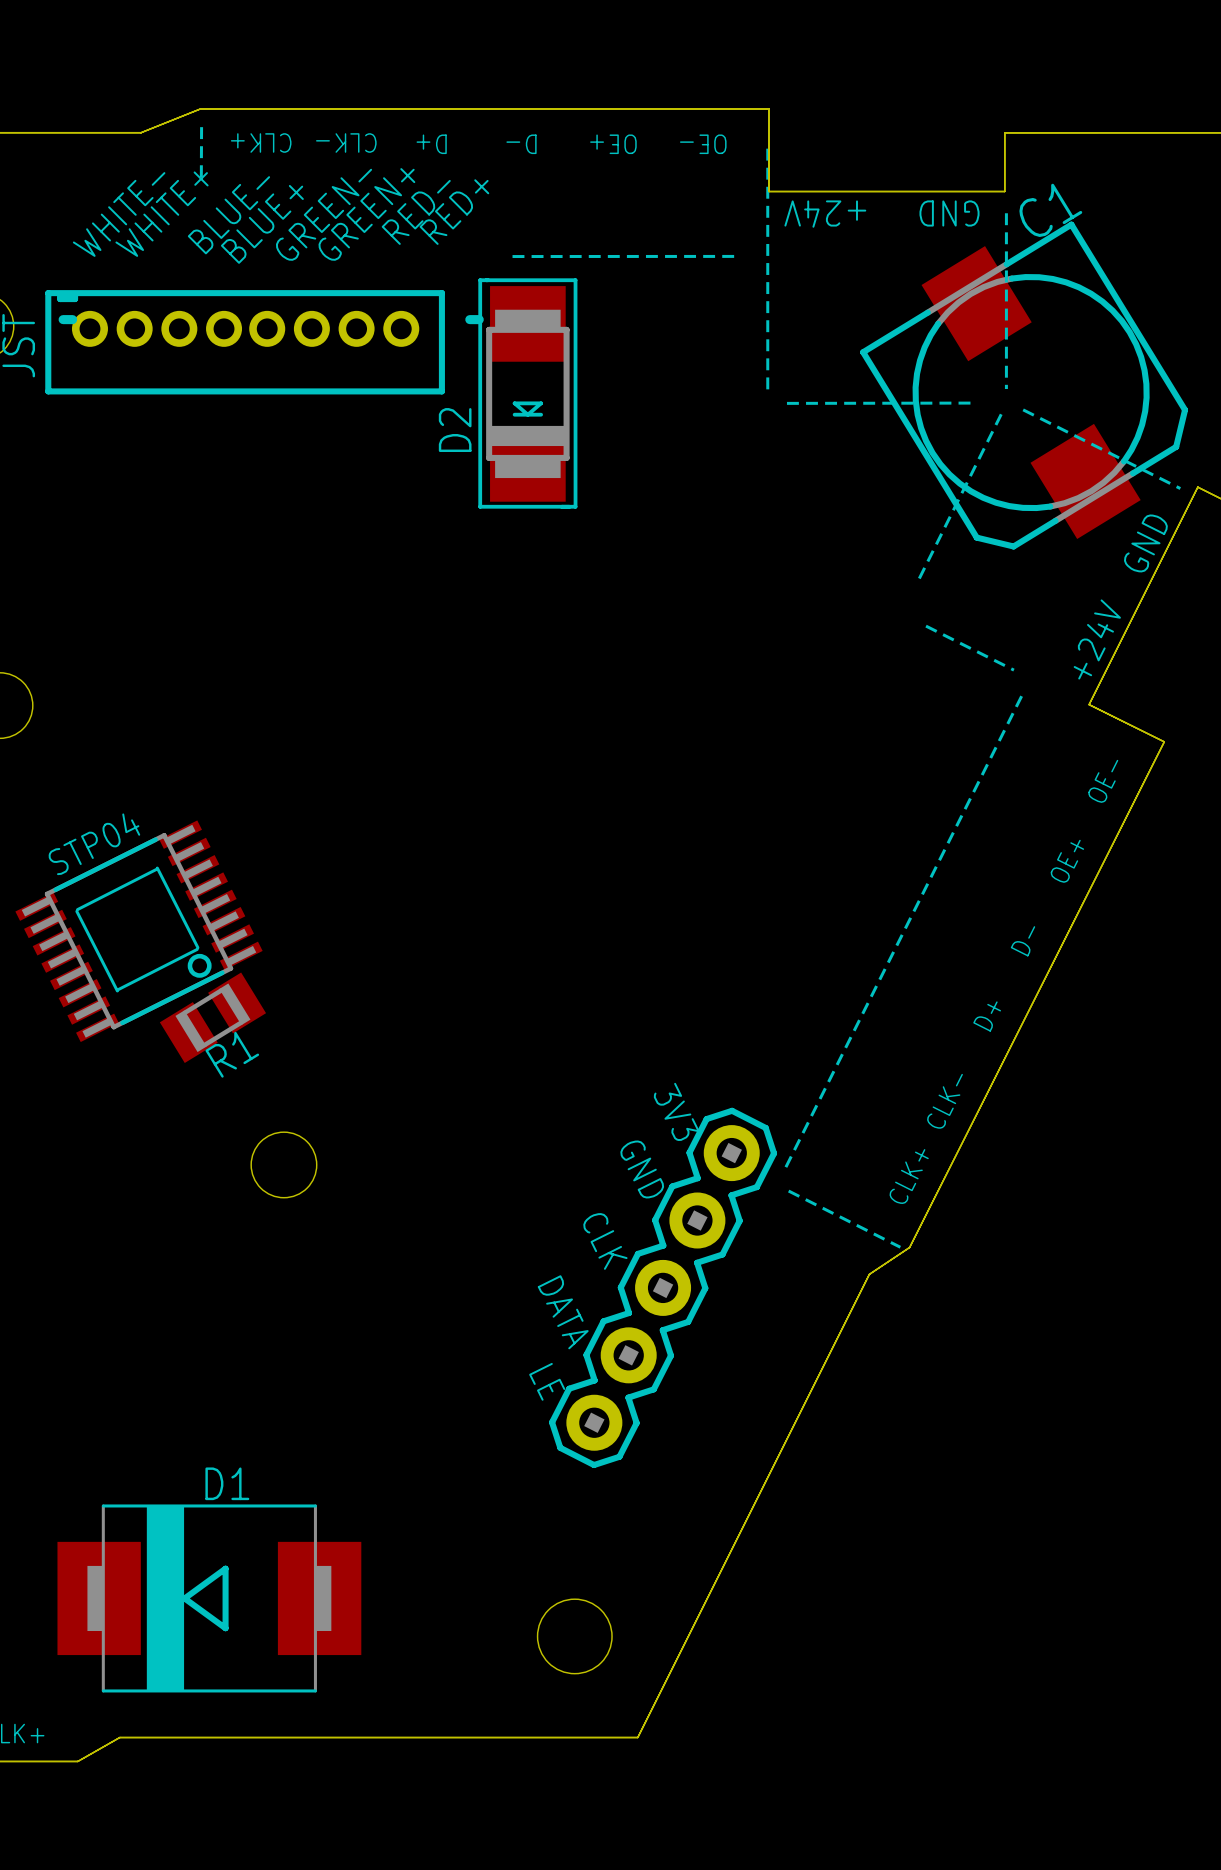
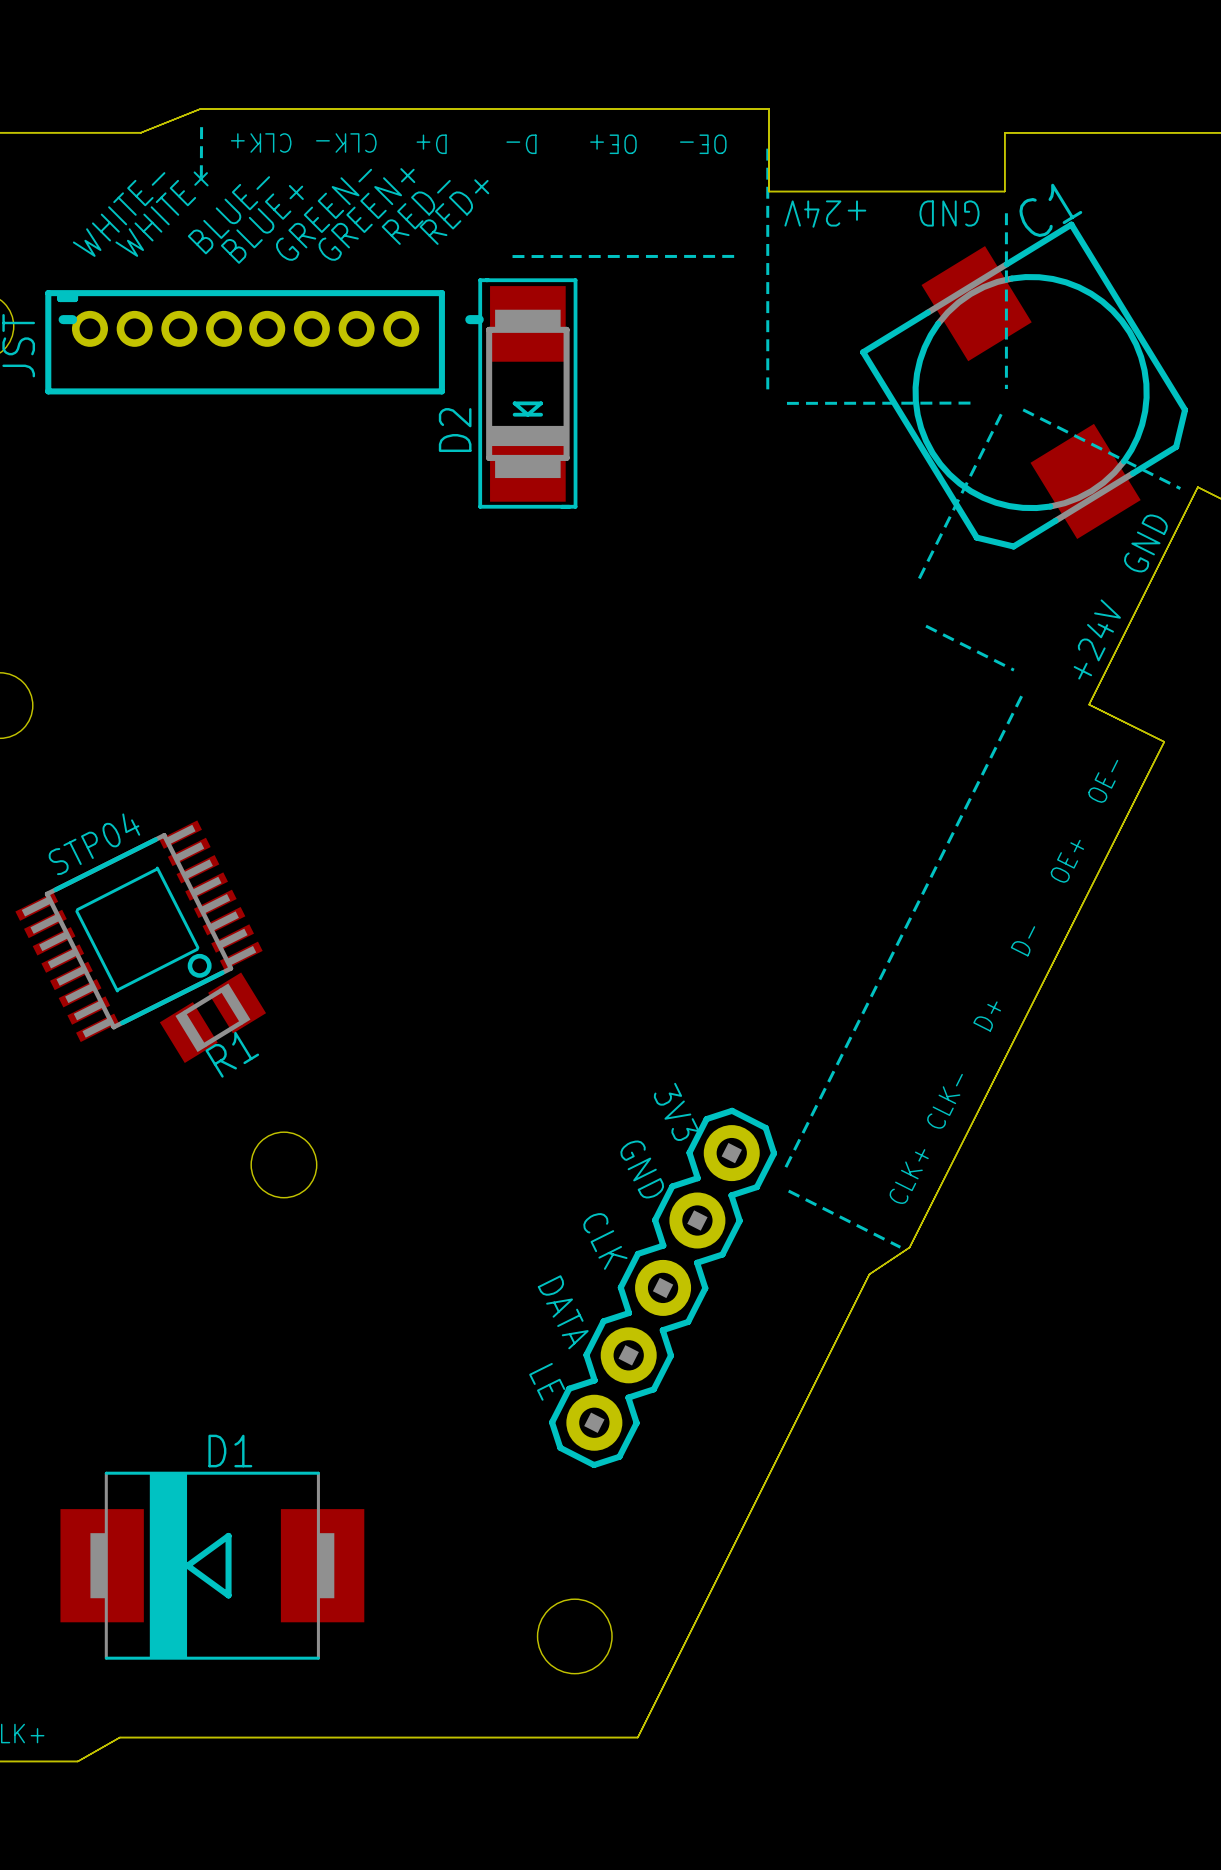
D1 position: (209, 1598) -> (212, 1565)

